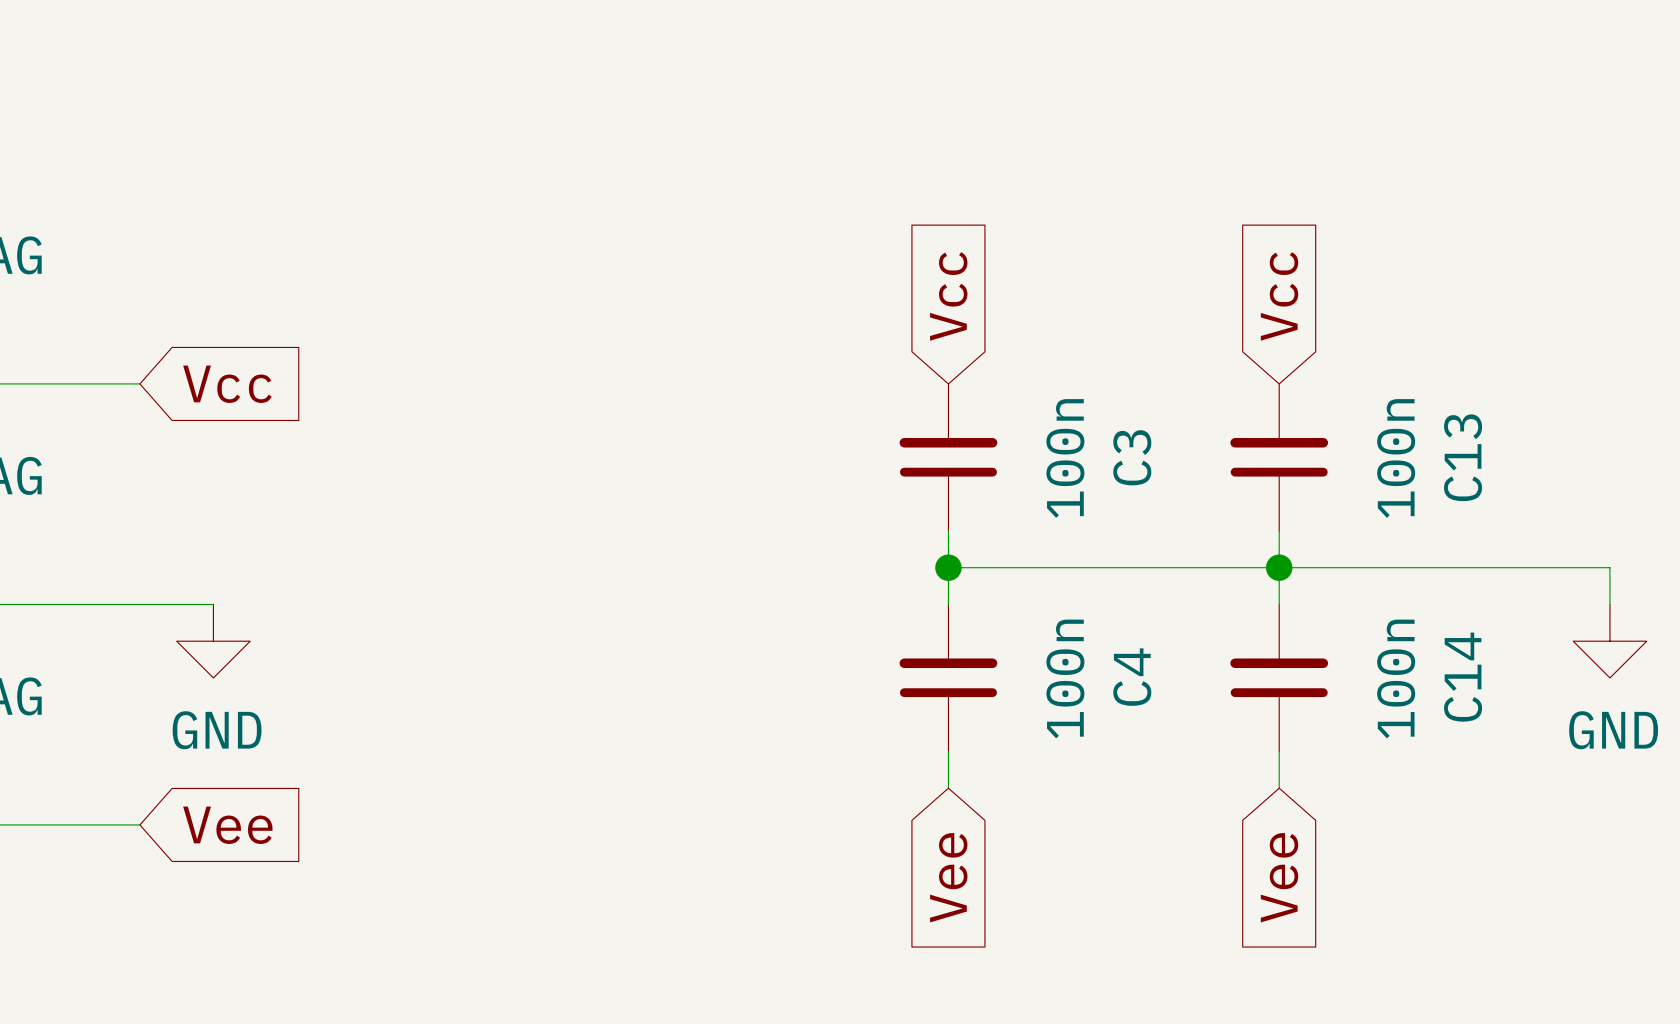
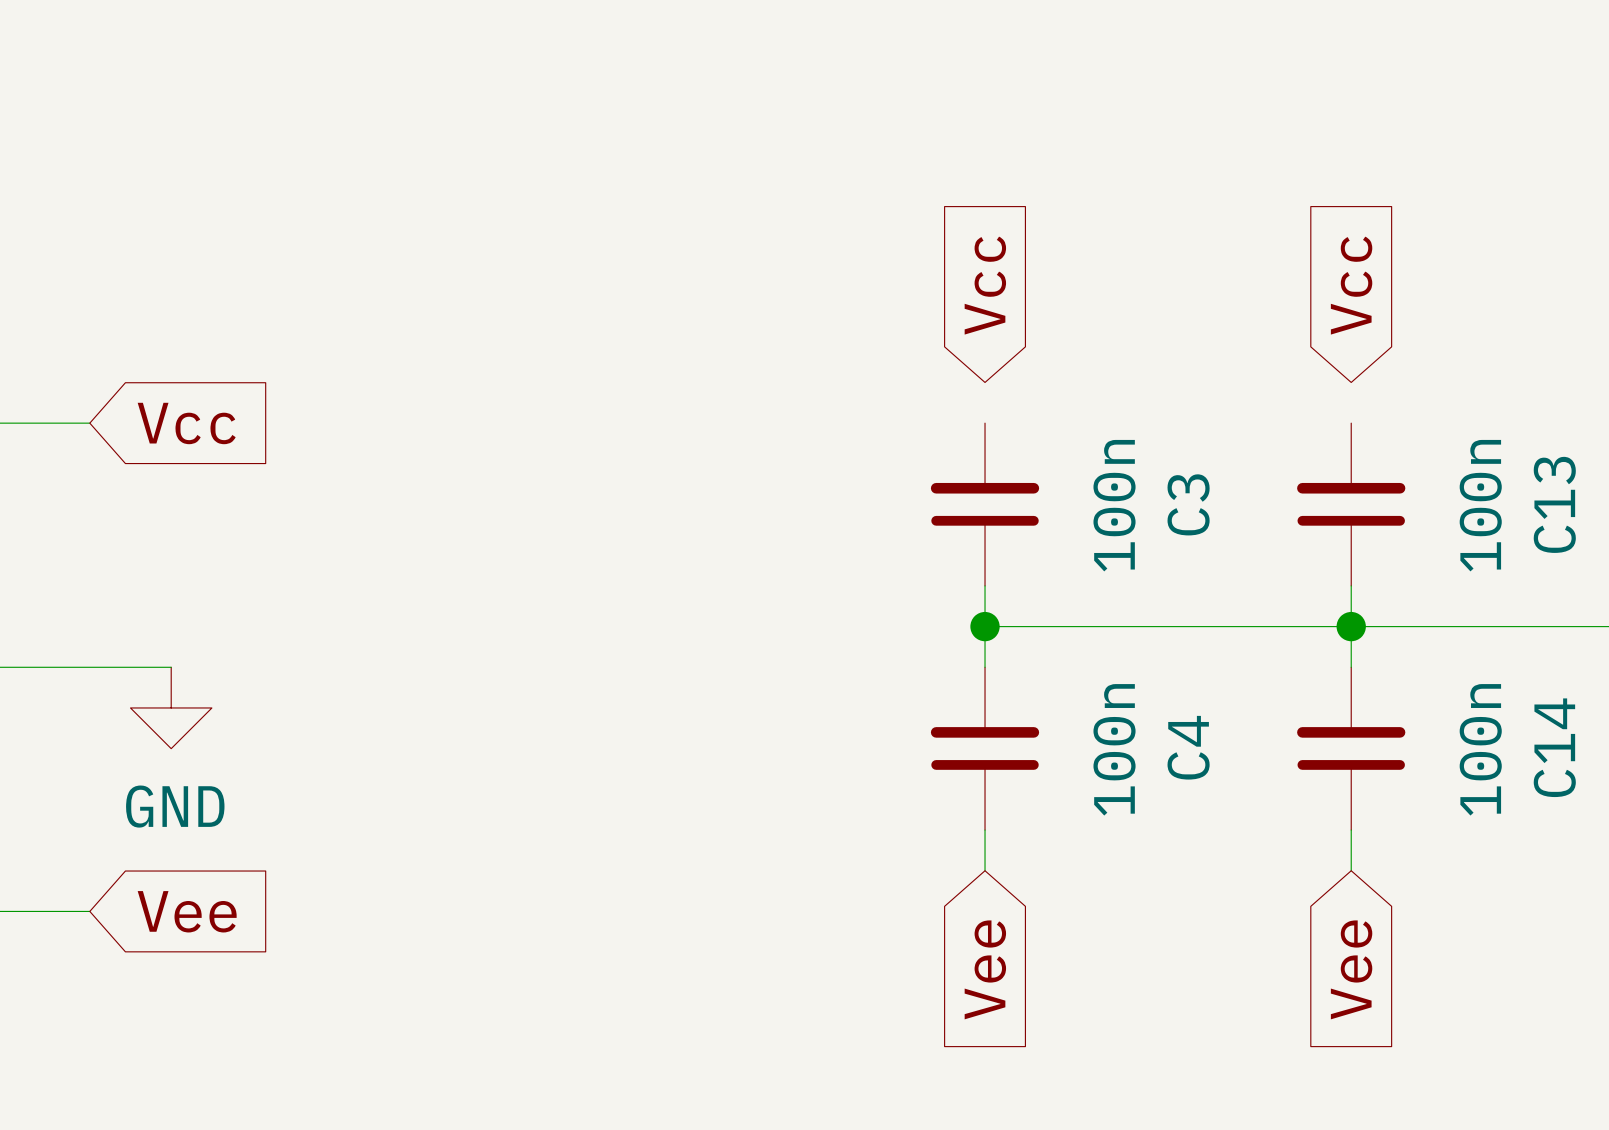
global label position: Vcc (948, 296) -> Vcc (985, 285)
global label position: Vcc (1279, 296) -> Vcc (1351, 285)

